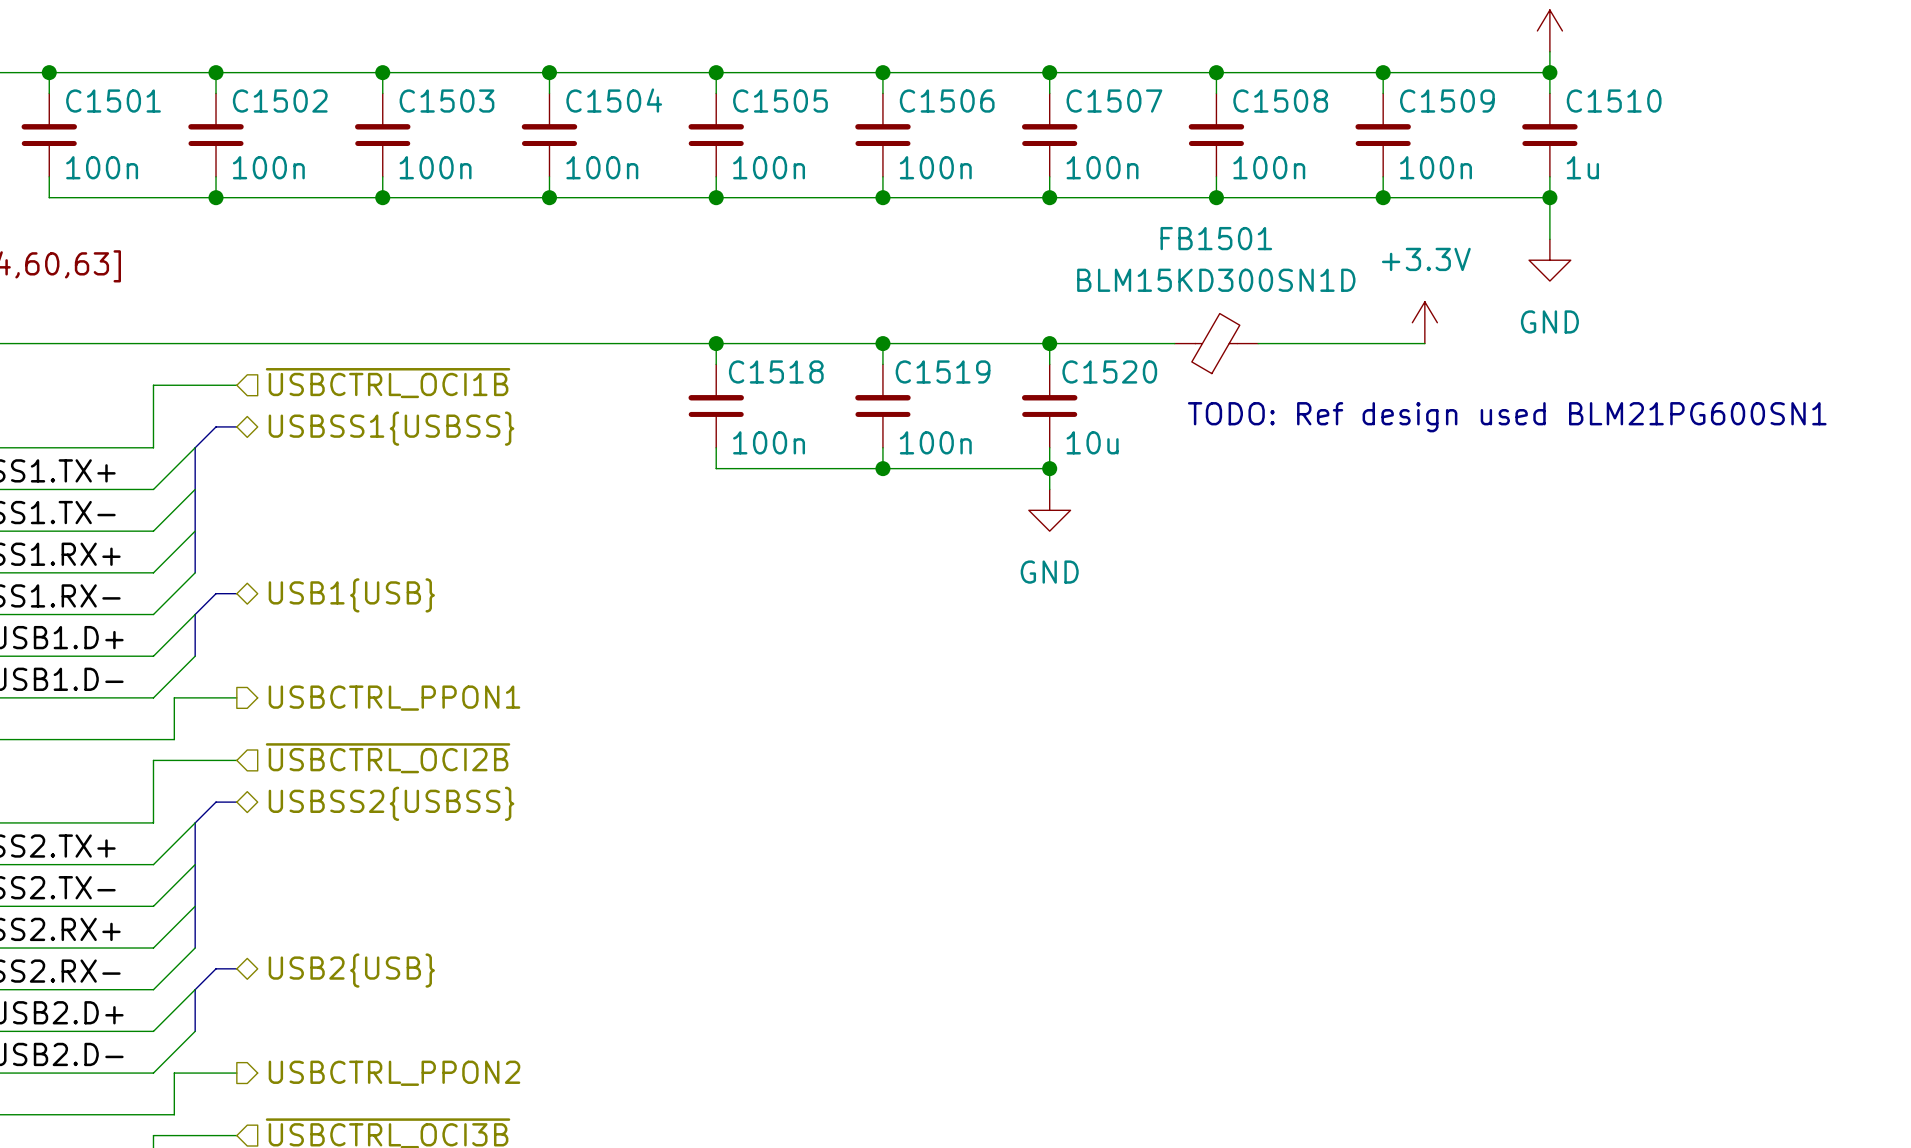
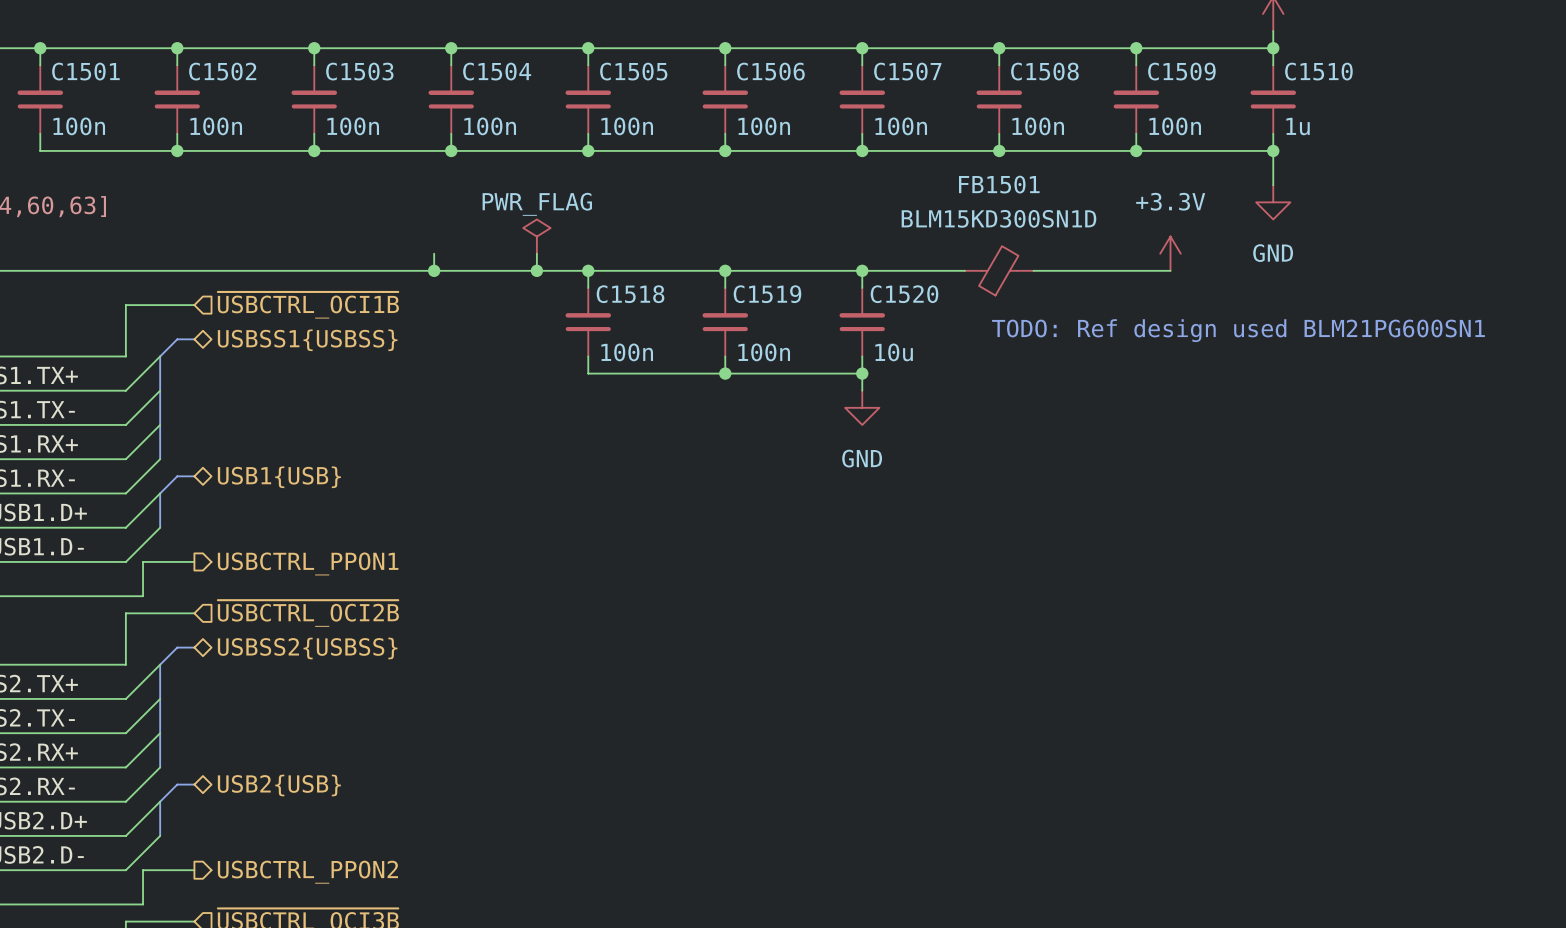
power symbol: none -> PWR_FLAG (536, 236)
wire: none -> (434, 253) (434, 270)
wire: none -> (536, 253) (536, 270)
junction: none -> (434, 270)
junction: none -> (536, 270)

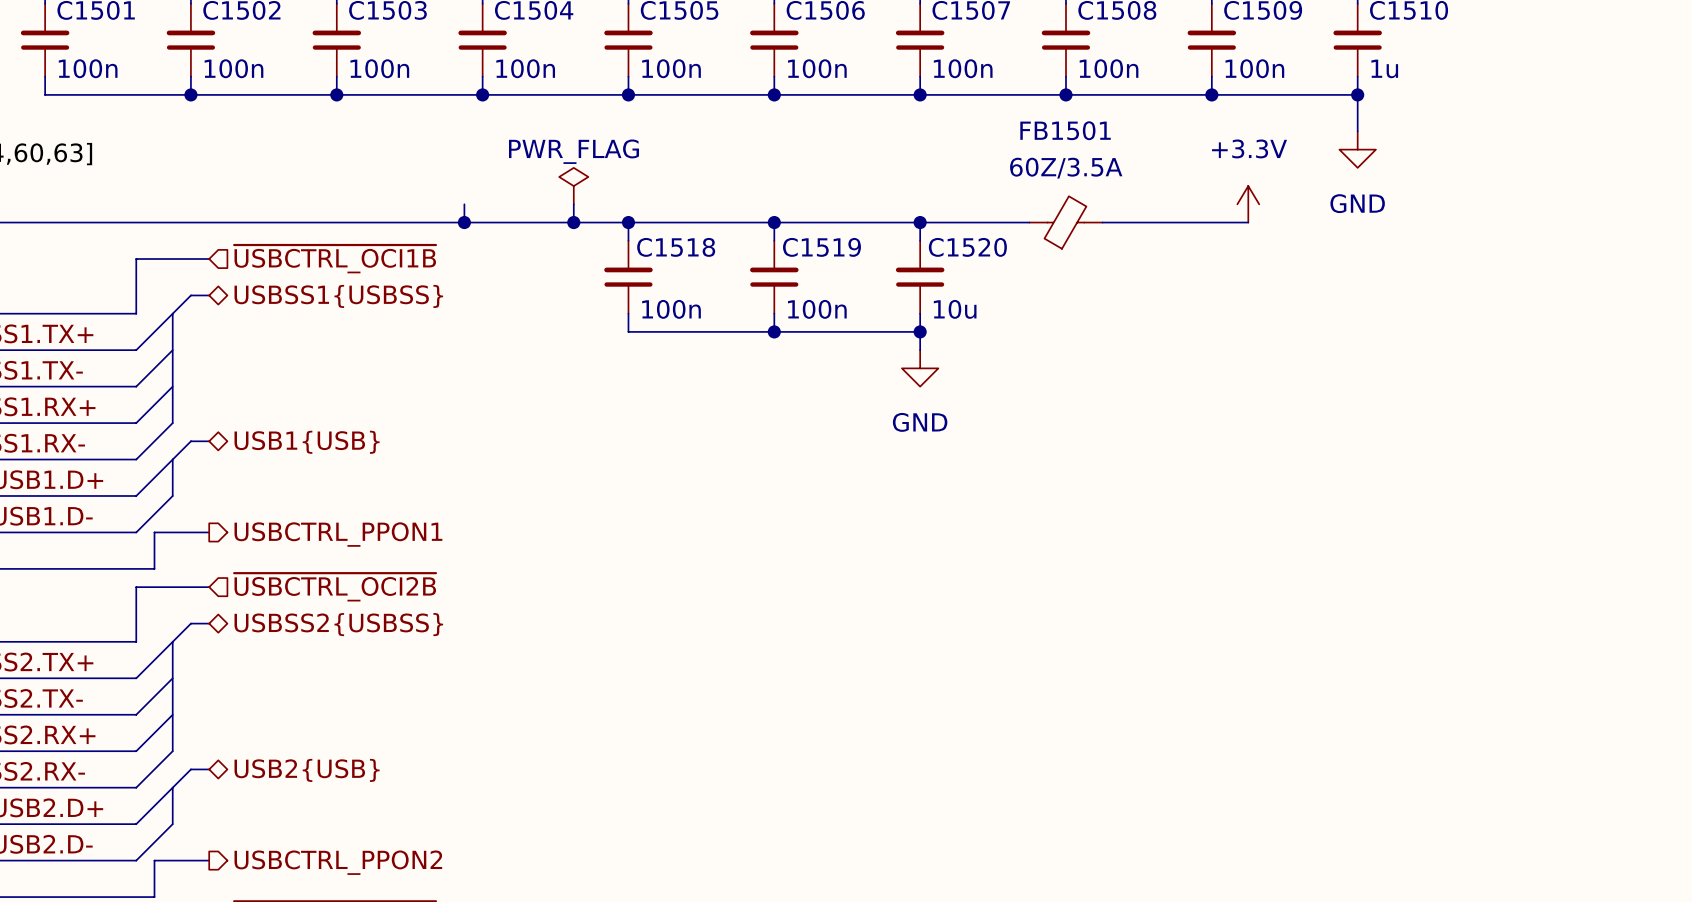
FB1501 text: BLM15KD300SN1D (998, 218) -> none
FB1501 text: none -> 60Z/3.5A (1066, 168)
text: TODO: Ref design used BLM21PG600SN1 (1238, 330) -> none

